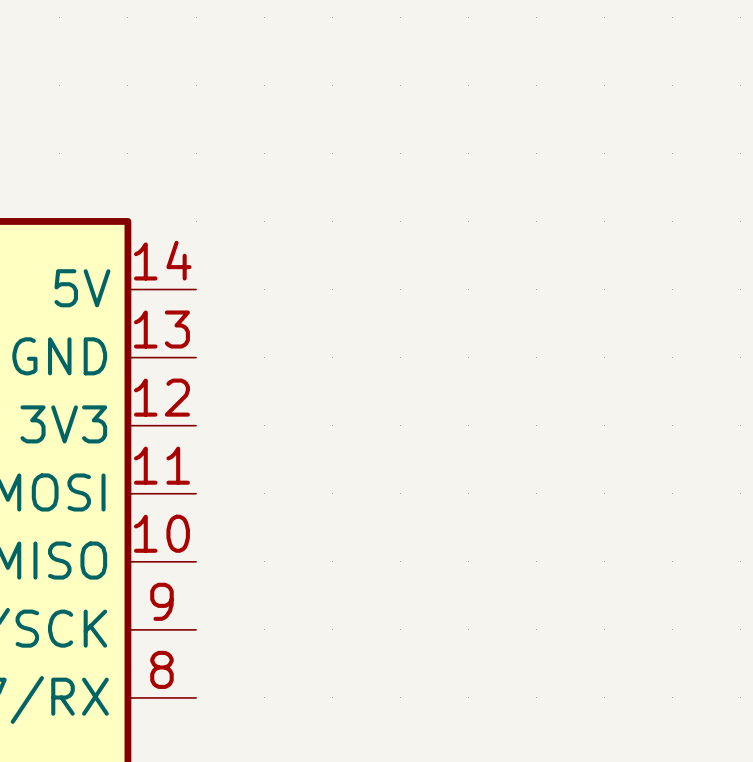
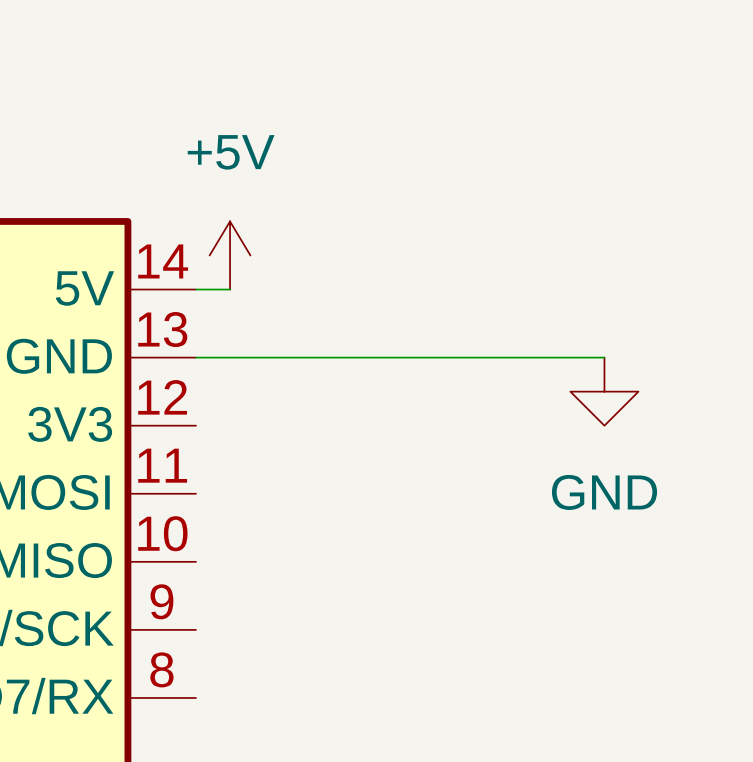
power symbol: none -> +5V (230, 255)
wire: none -> (196, 289) (230, 289)
wire: none -> (196, 357) (604, 357)
power symbol: none -> GND (604, 391)

